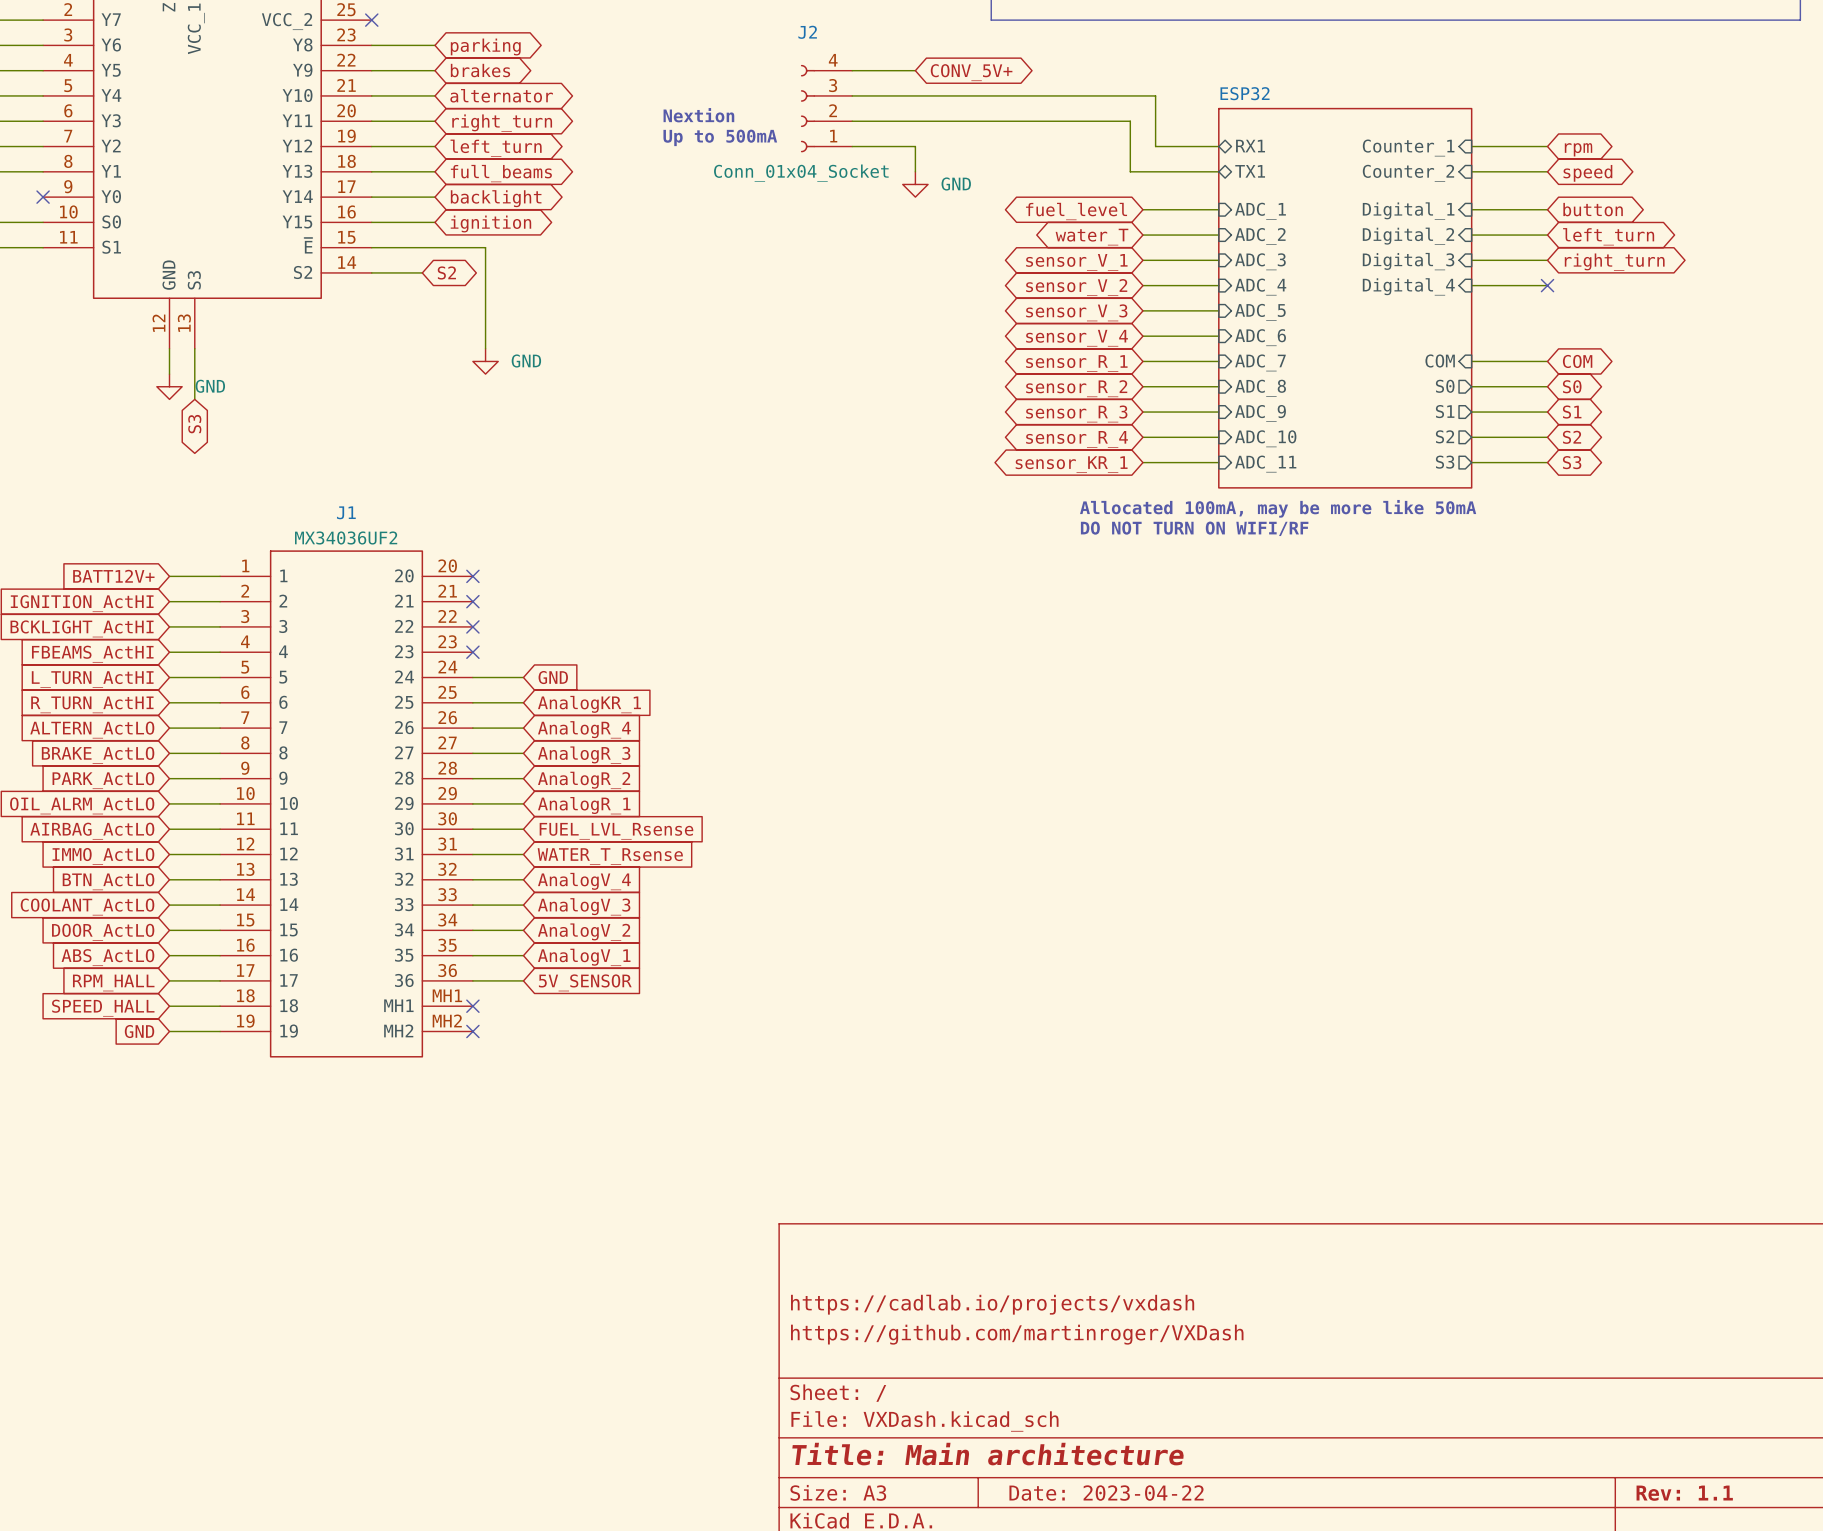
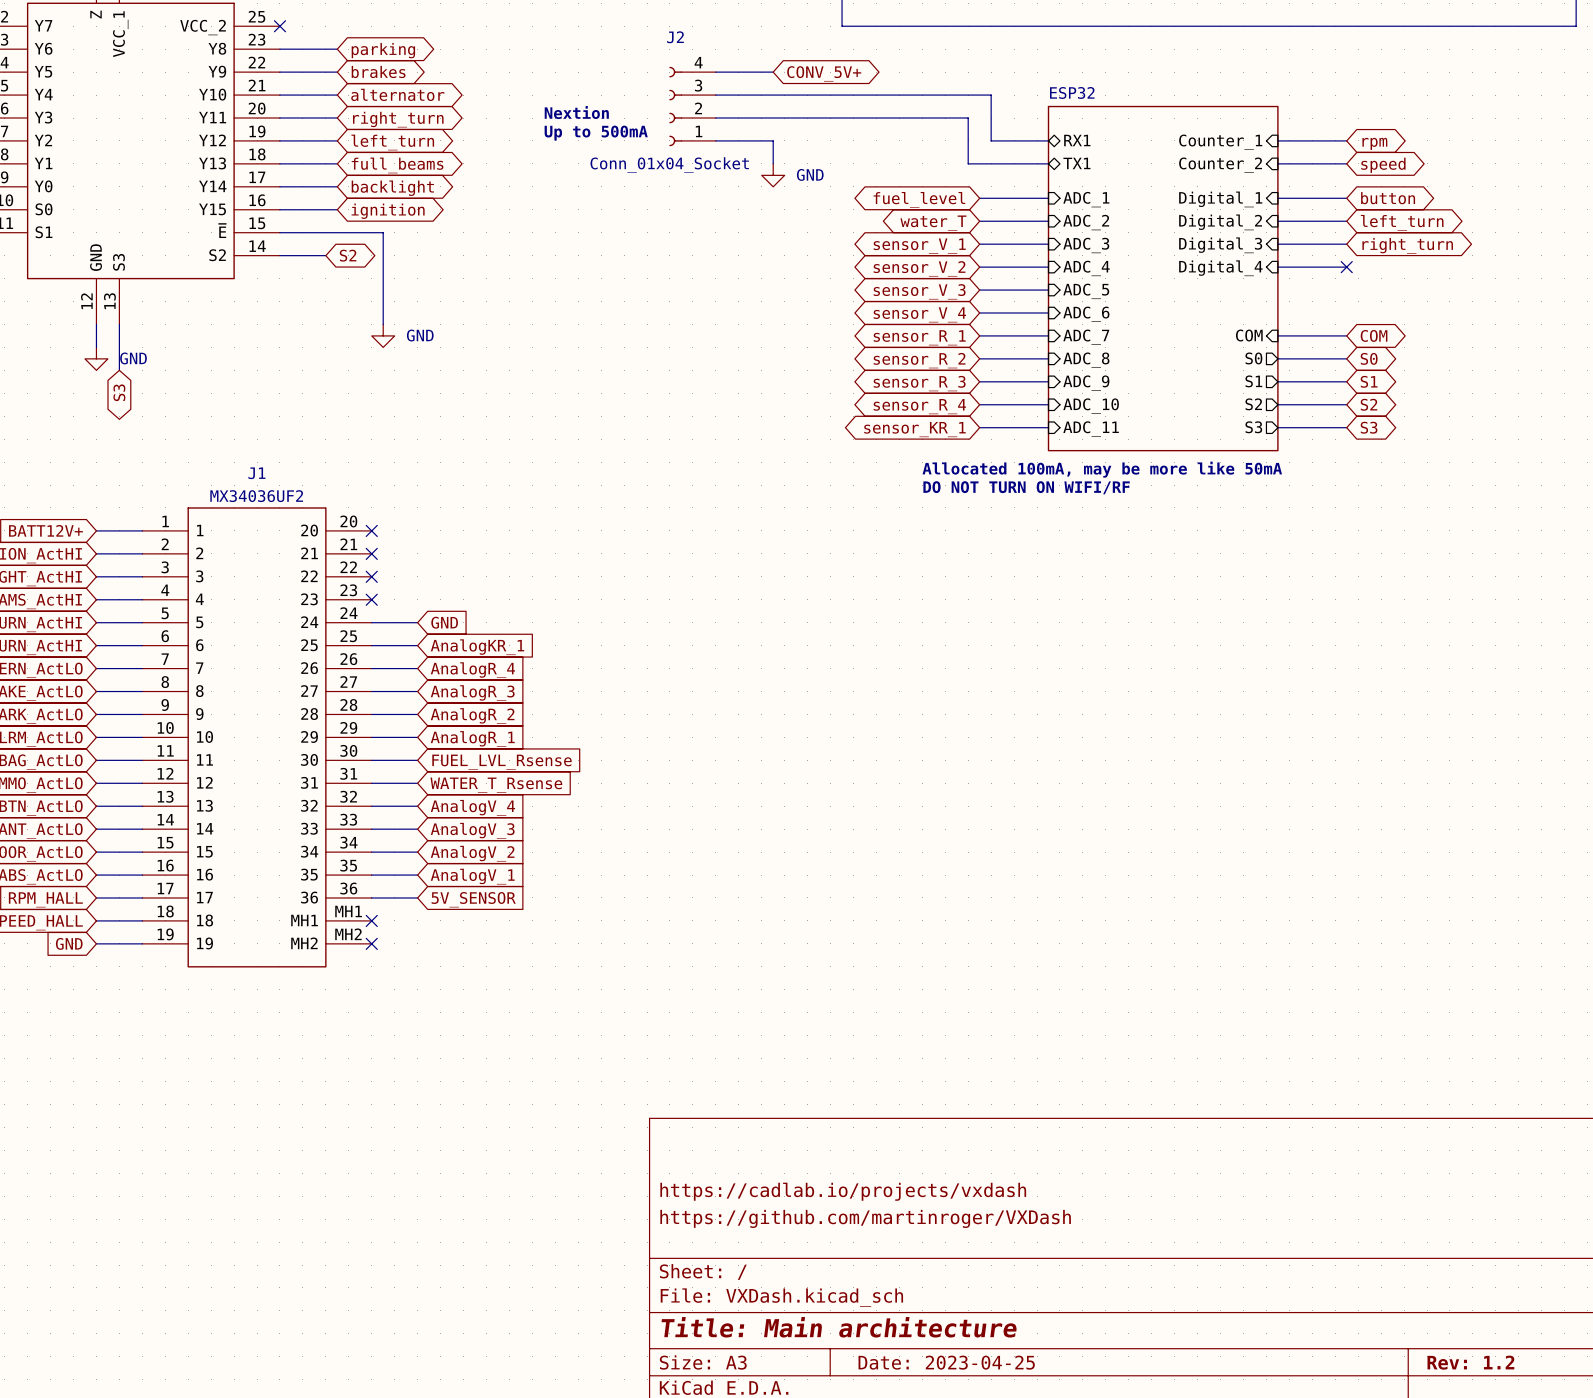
title block: Date: 2023-04-22 (1106, 1493) -> Date: 2023-04-25 (946, 1362)
title block: Rev: 1.1 (1684, 1493) -> Rev: 1.2 (1470, 1362)

